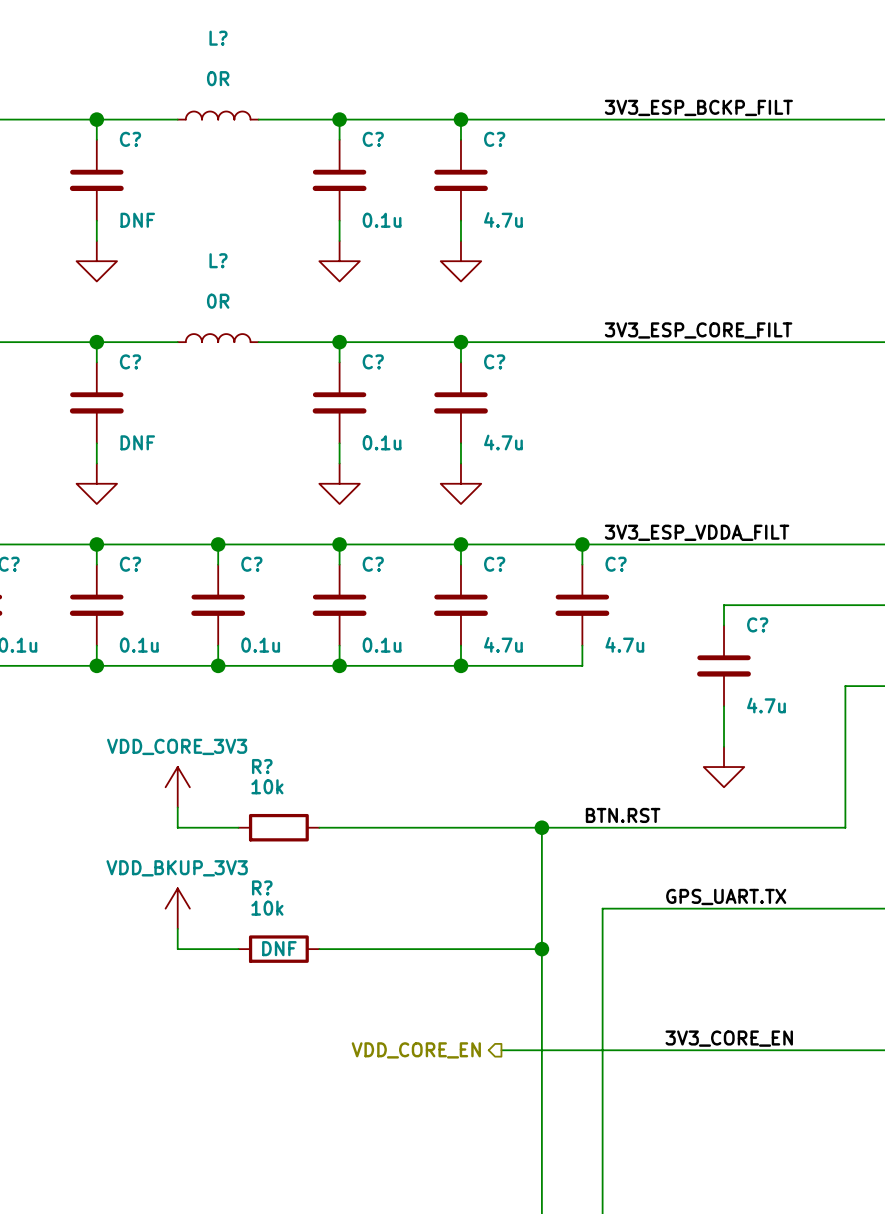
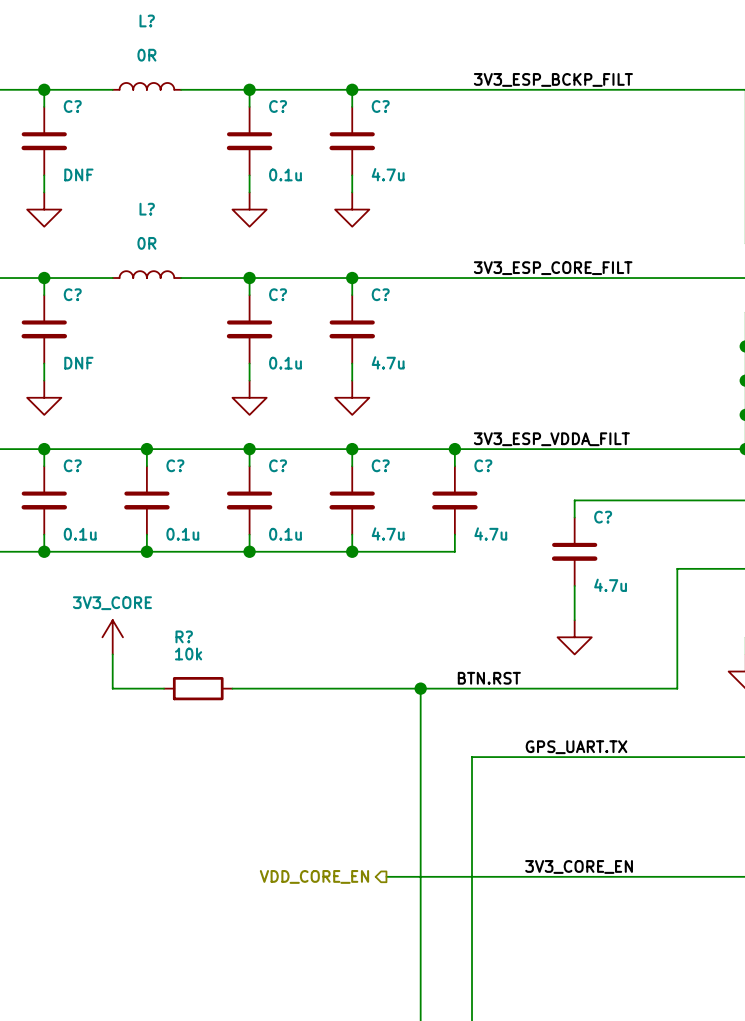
power symbol: none -> 3V3_CORE (112, 637)
power symbol: VDD_CORE_3V3 (177, 787) -> none
power symbol: VDD_BKUP_3V3 (177, 908) -> none
wire: (177, 928) (177, 949) (238, 949) -> none
R?: 10k (278, 949) -> none
wire: (319, 949) (541, 949) -> none
junction: (541, 949) -> none

